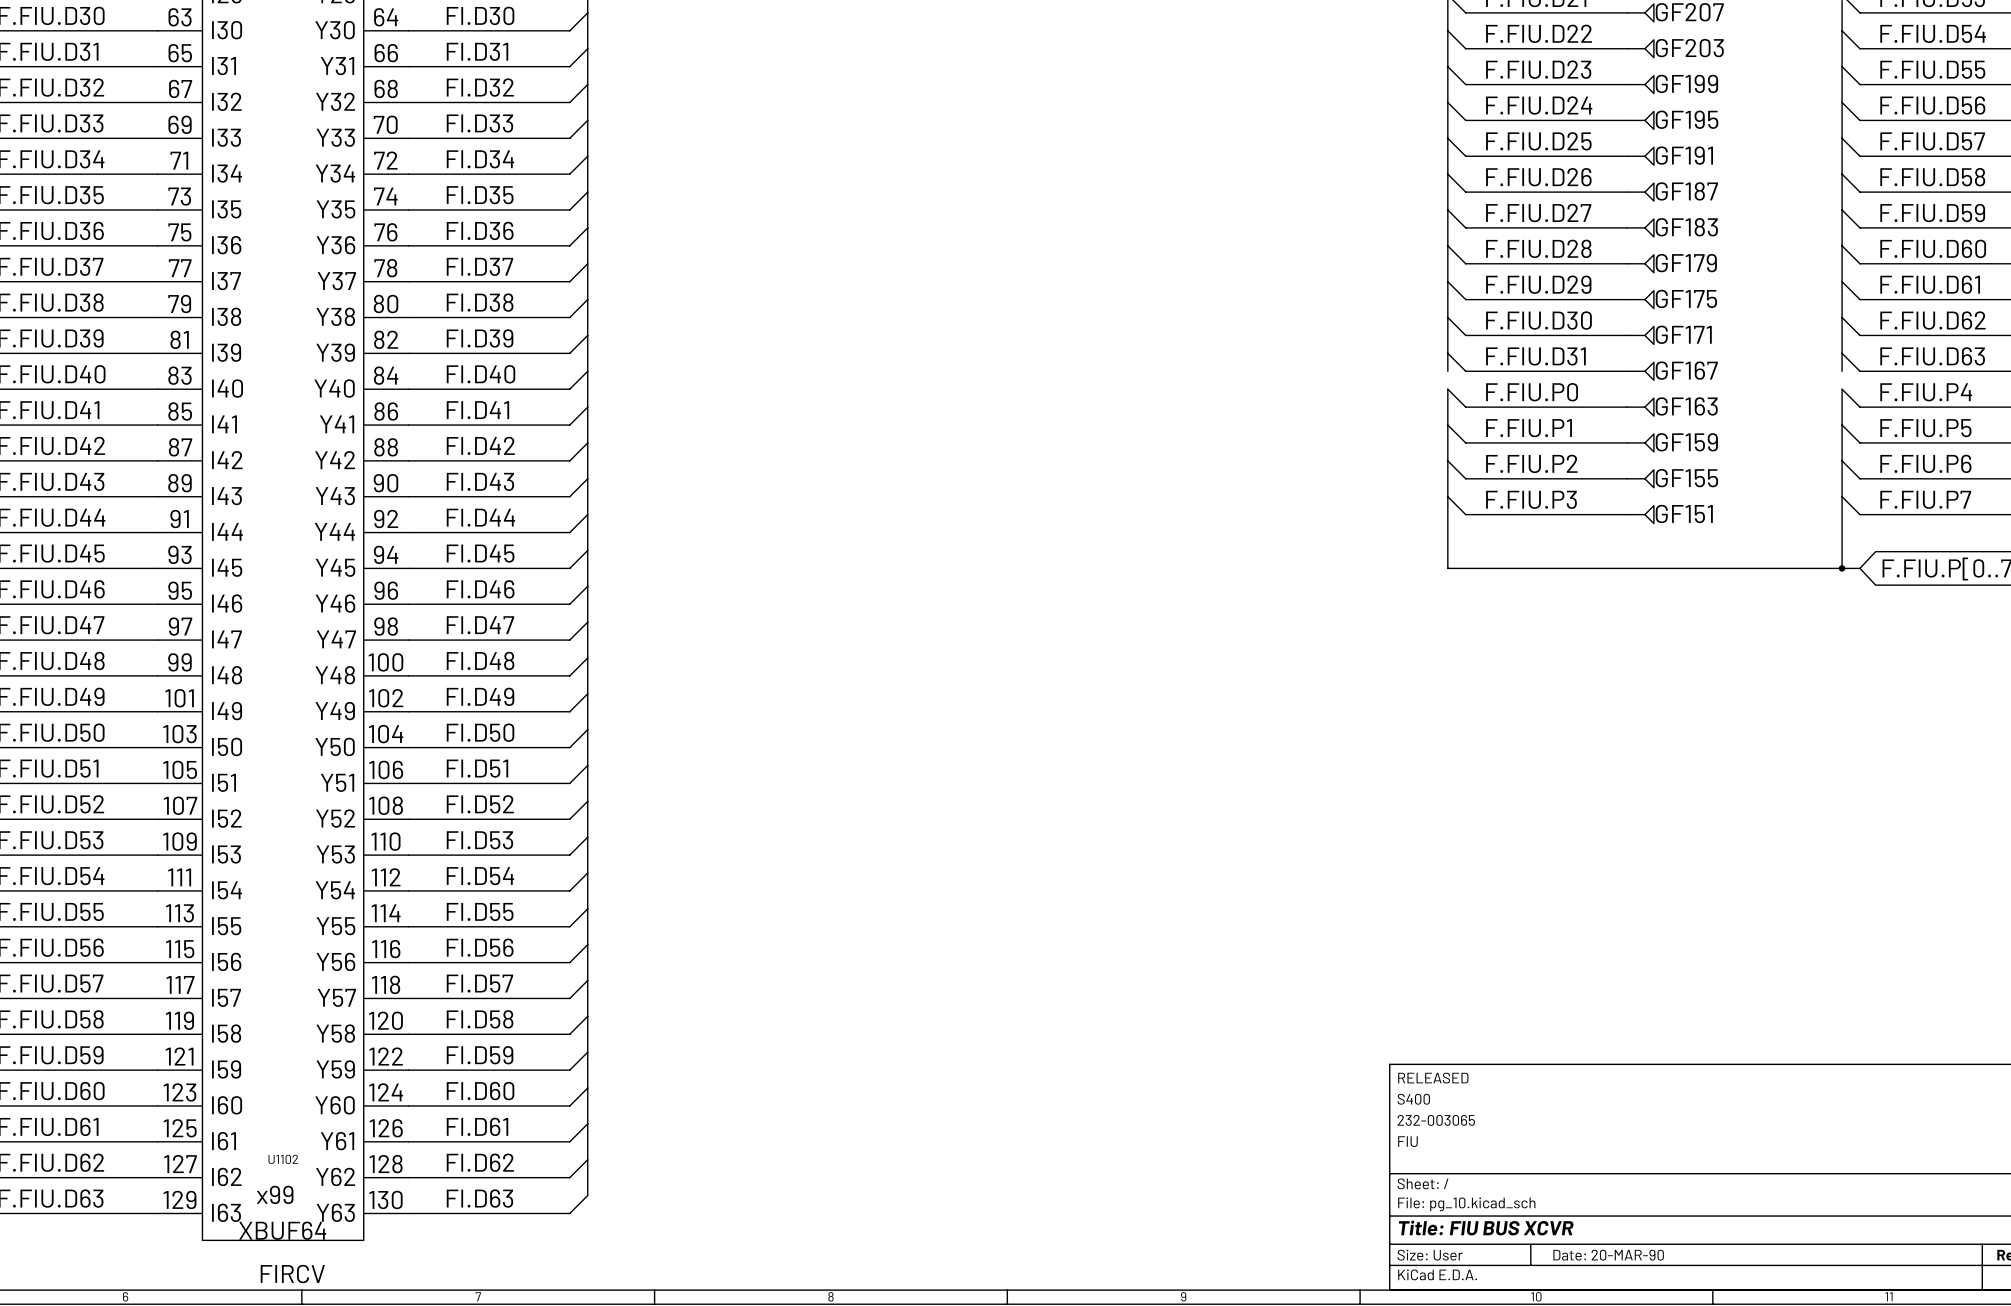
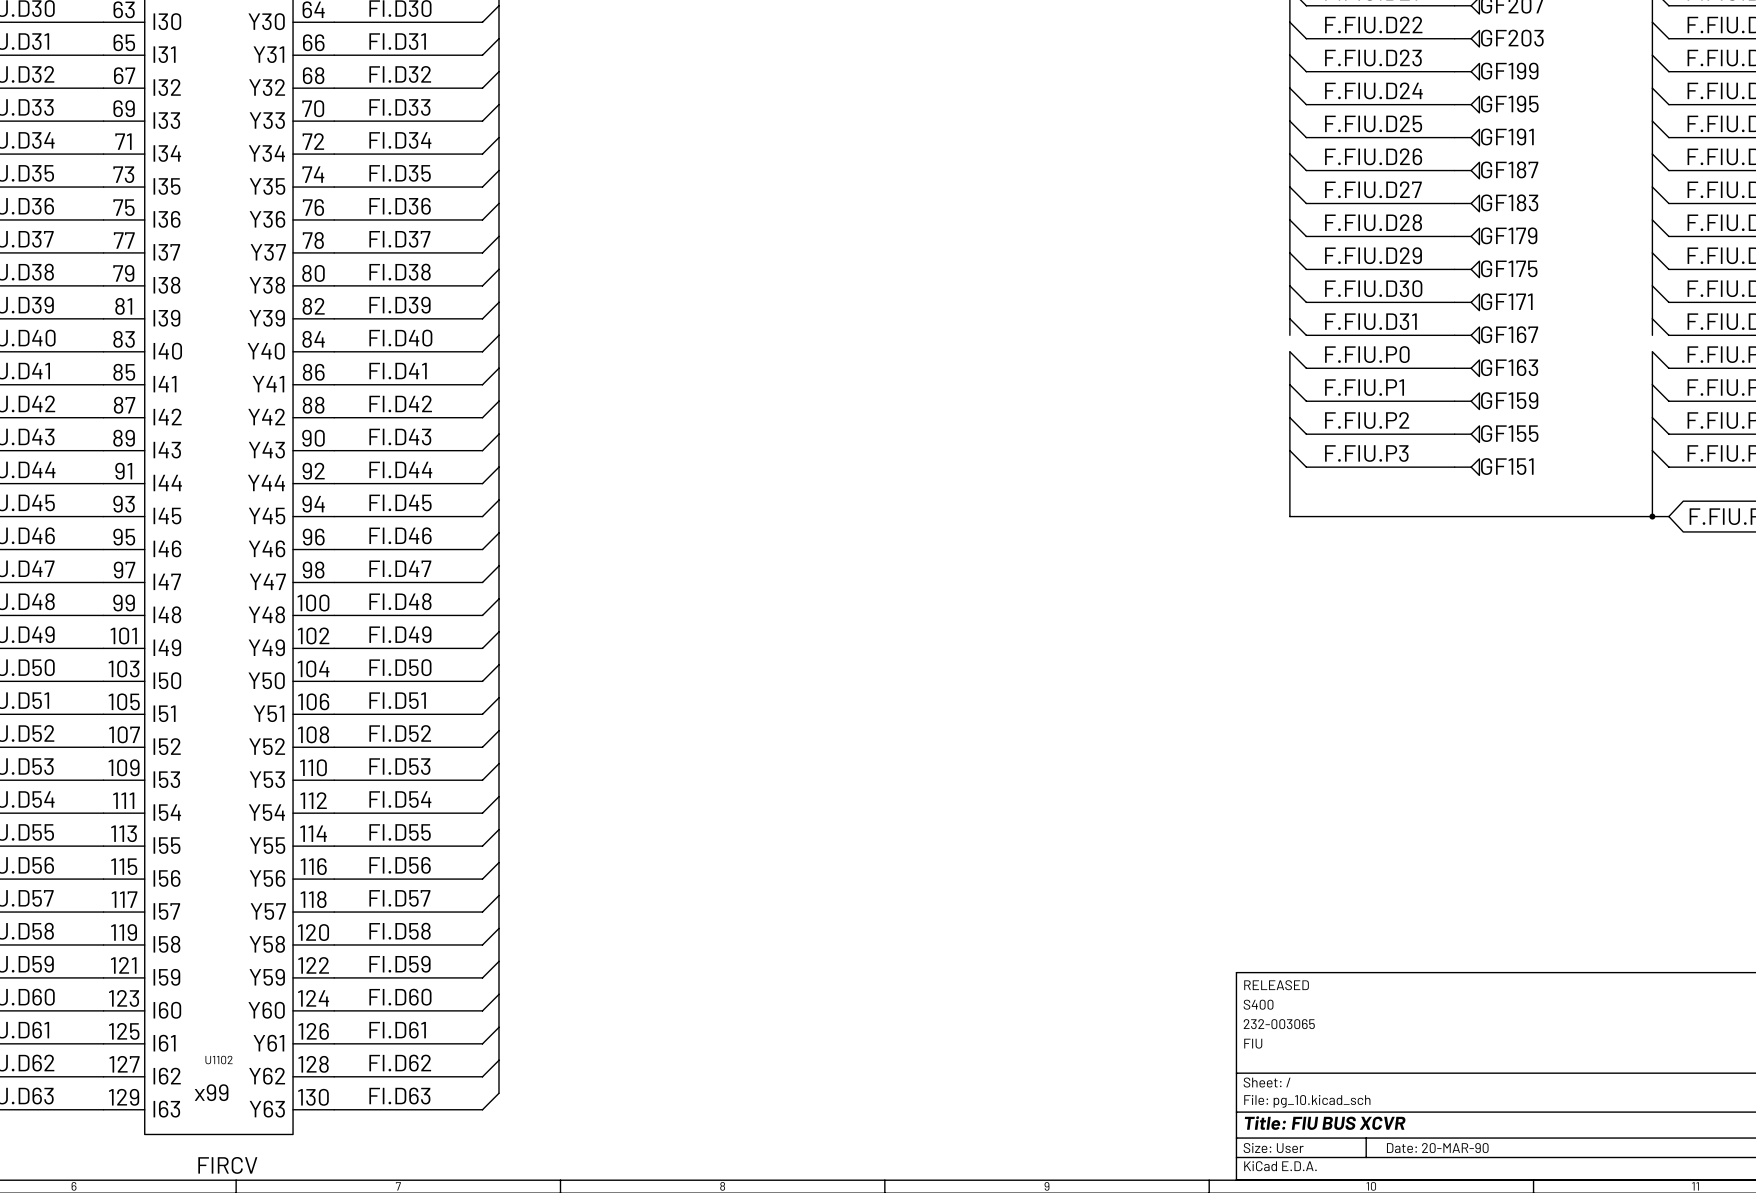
U1102 value: XBUF64 (282, 1230) -> none

